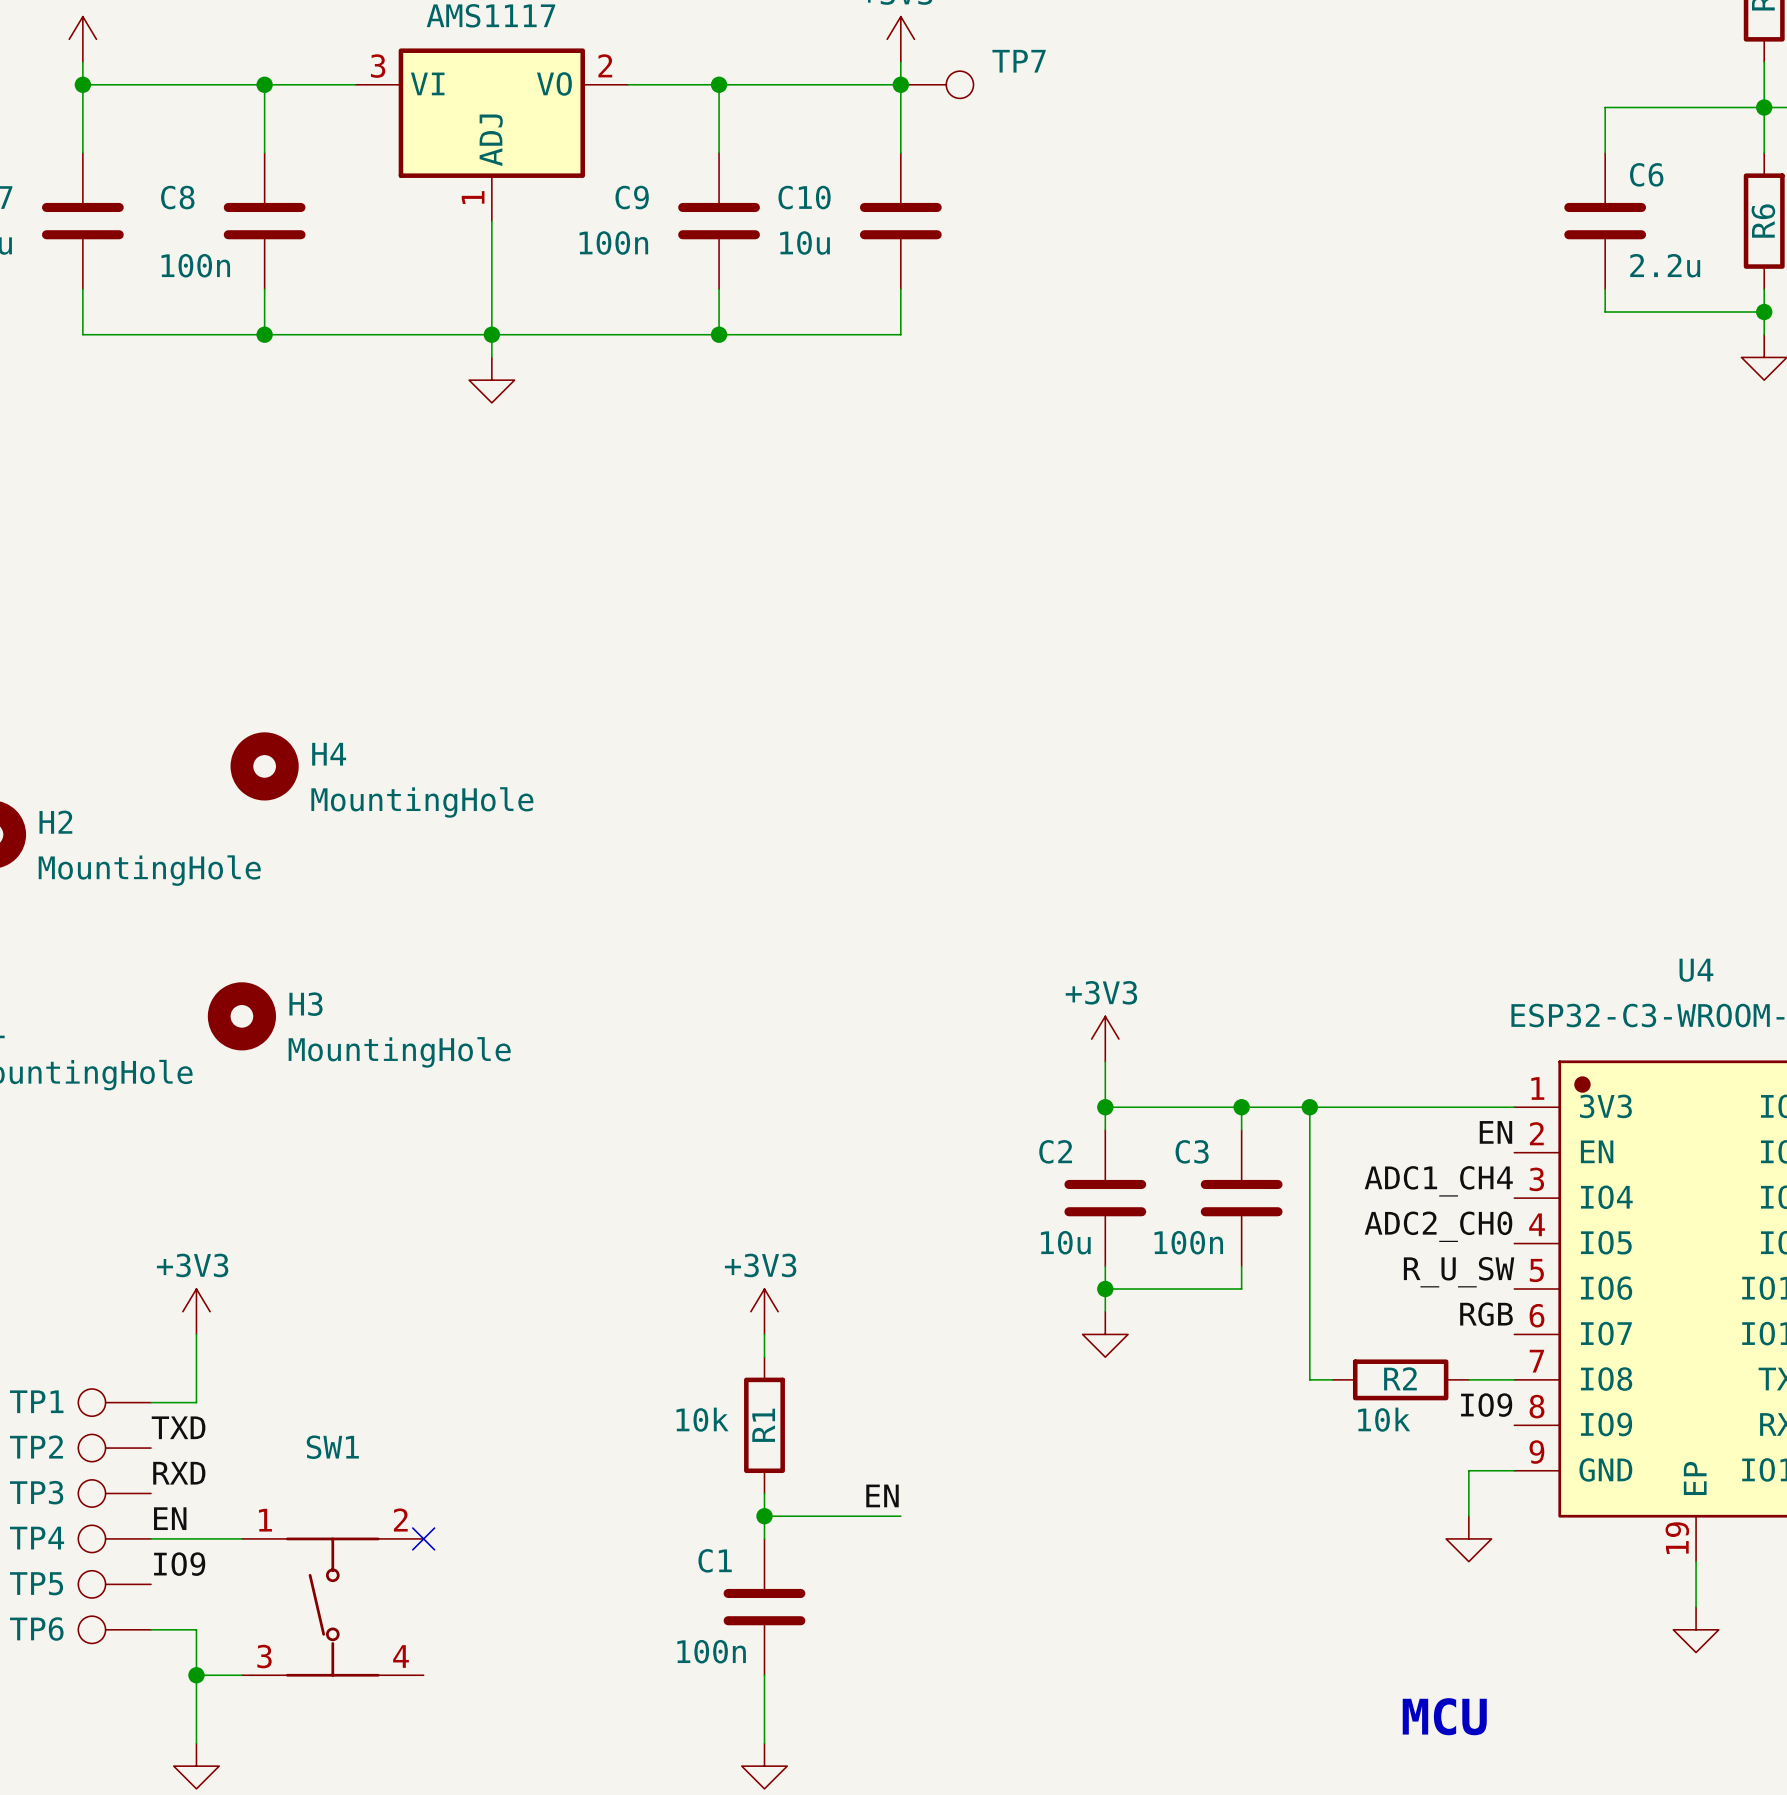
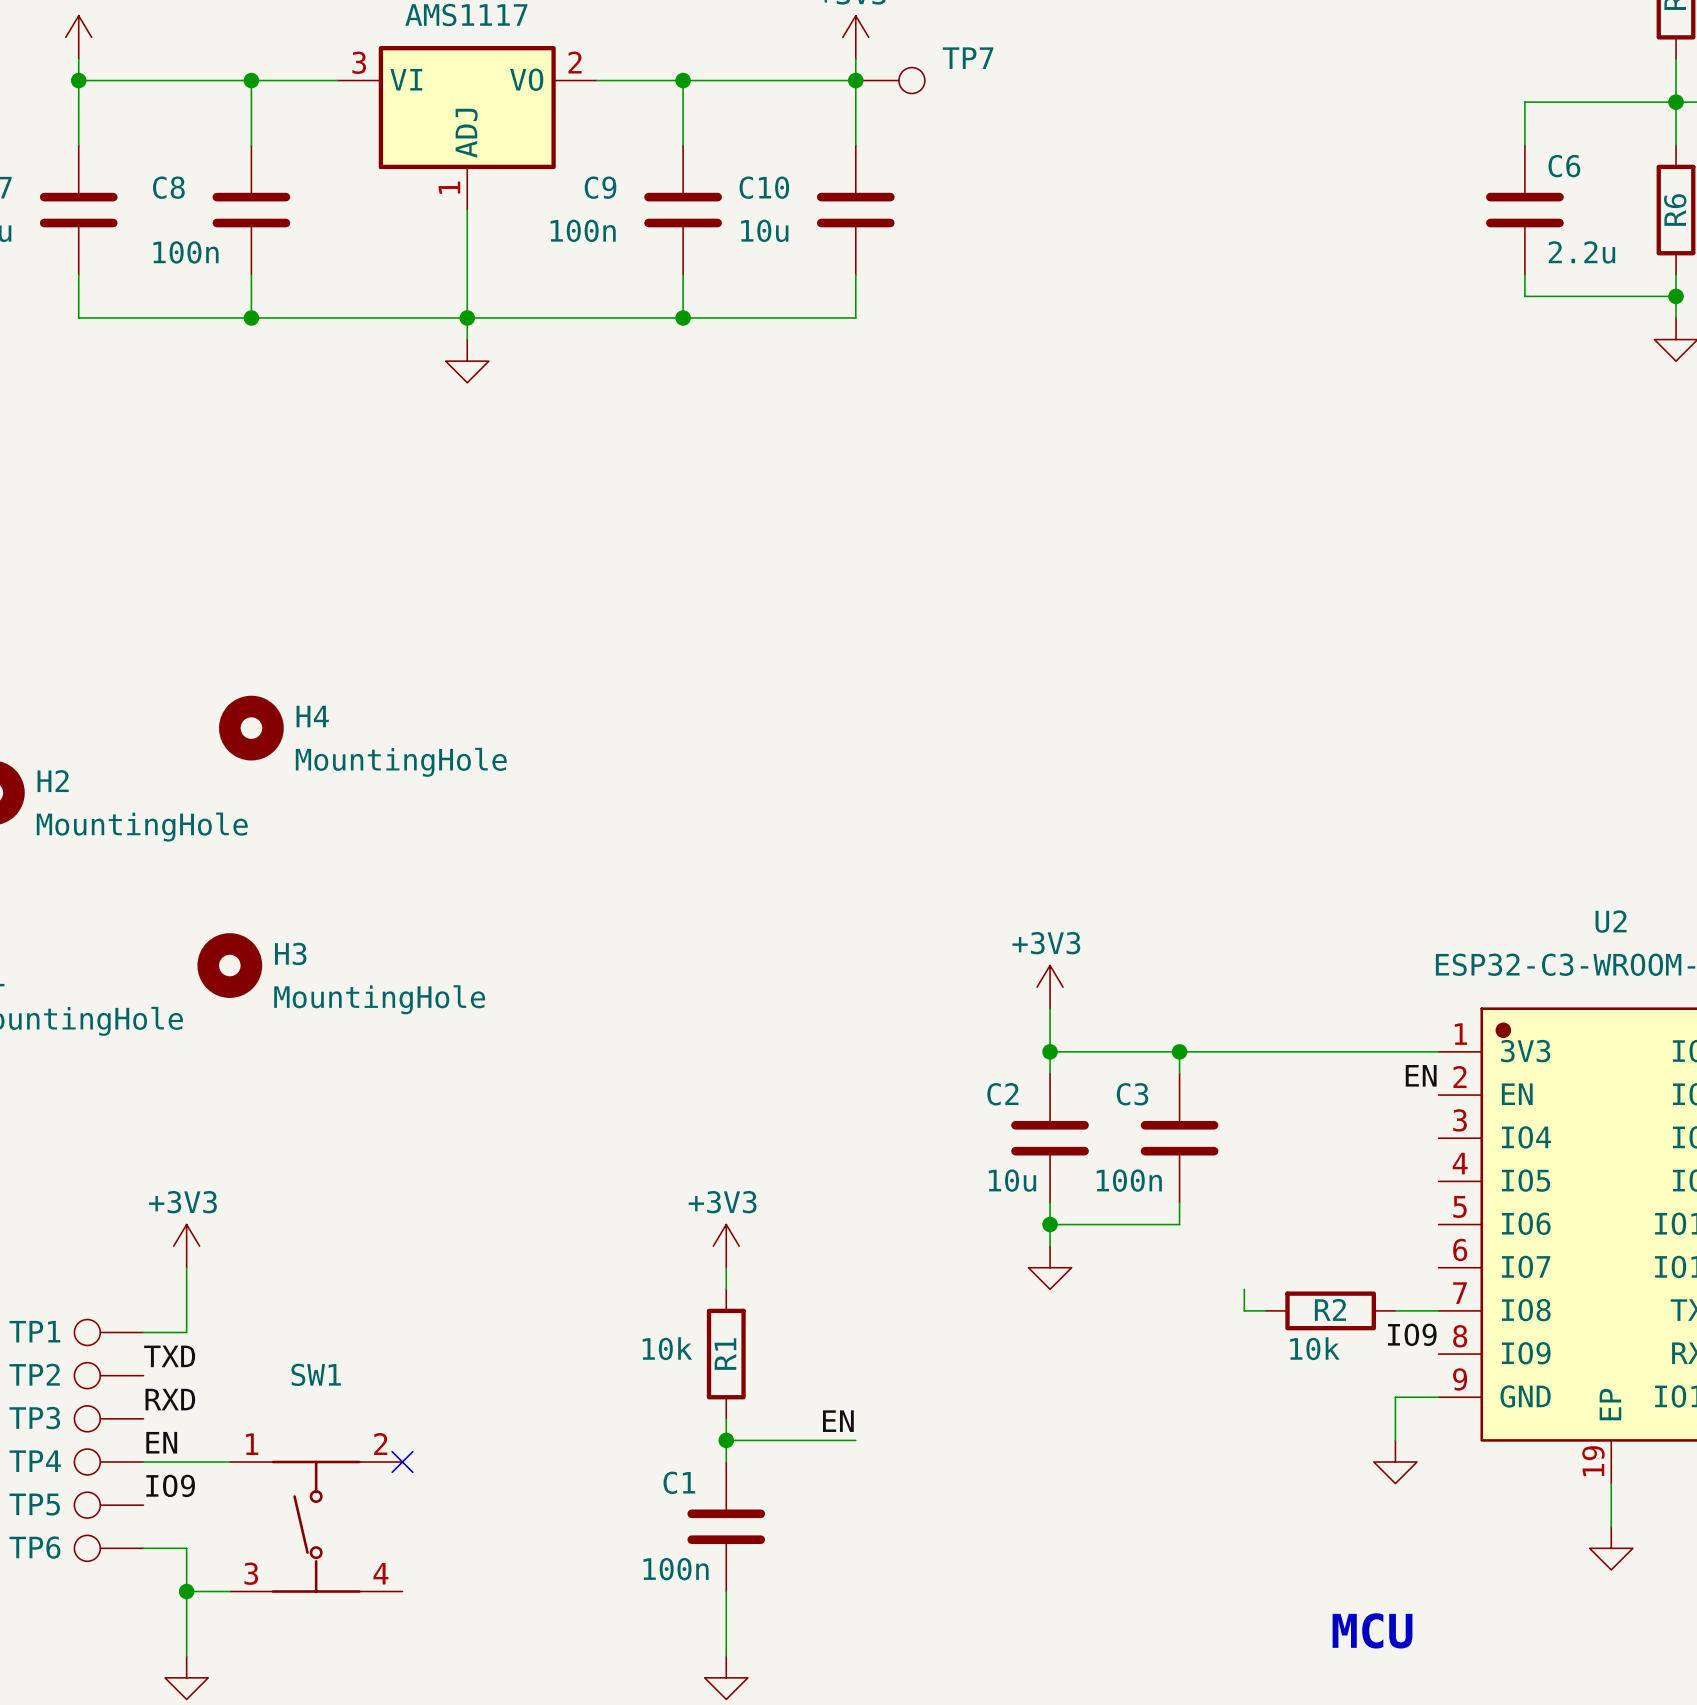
U4 name: U4 (1696, 970) -> U2 (1611, 921)
wire: (1309, 1107) (1309, 1357) -> none
junction: (1309, 1107) -> none
label: ADC1_CH4 (1438, 1181) -> none
label: ADC2_CH0 (1438, 1226) -> none
label: R_U_SW (1459, 1272) -> none
label: RGB (1486, 1314) -> none

